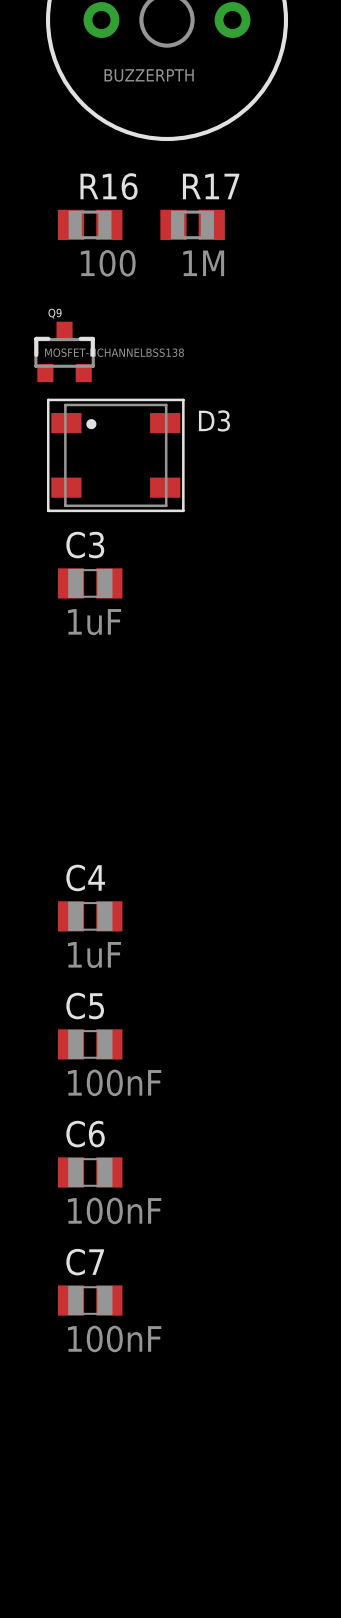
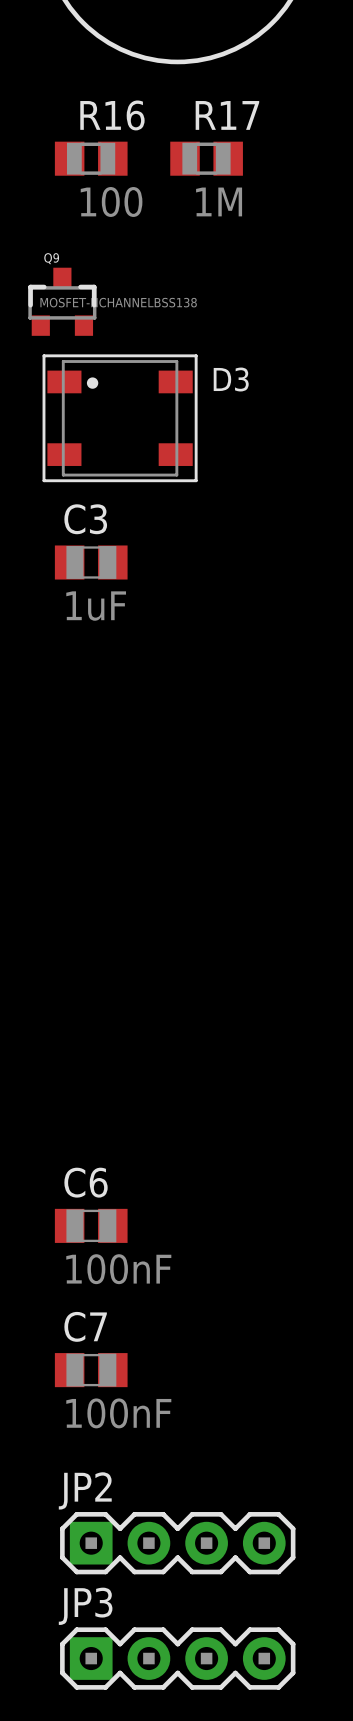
C4: 1uF (90, 916) -> none
C5: 100nF (90, 1044) -> none
JP2: none -> (177, 1543)
JP3: none -> (177, 1658)

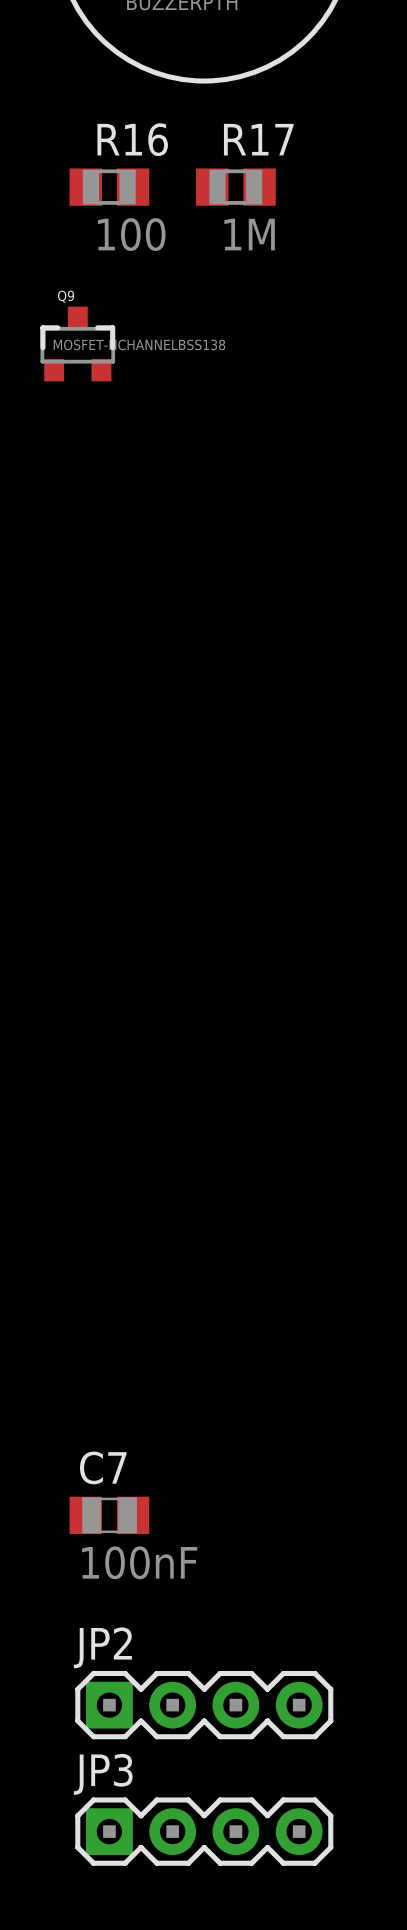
D3: (120, 418) -> none
C3: 1uF (91, 562) -> none
C6: 100nF (91, 1225) -> none

